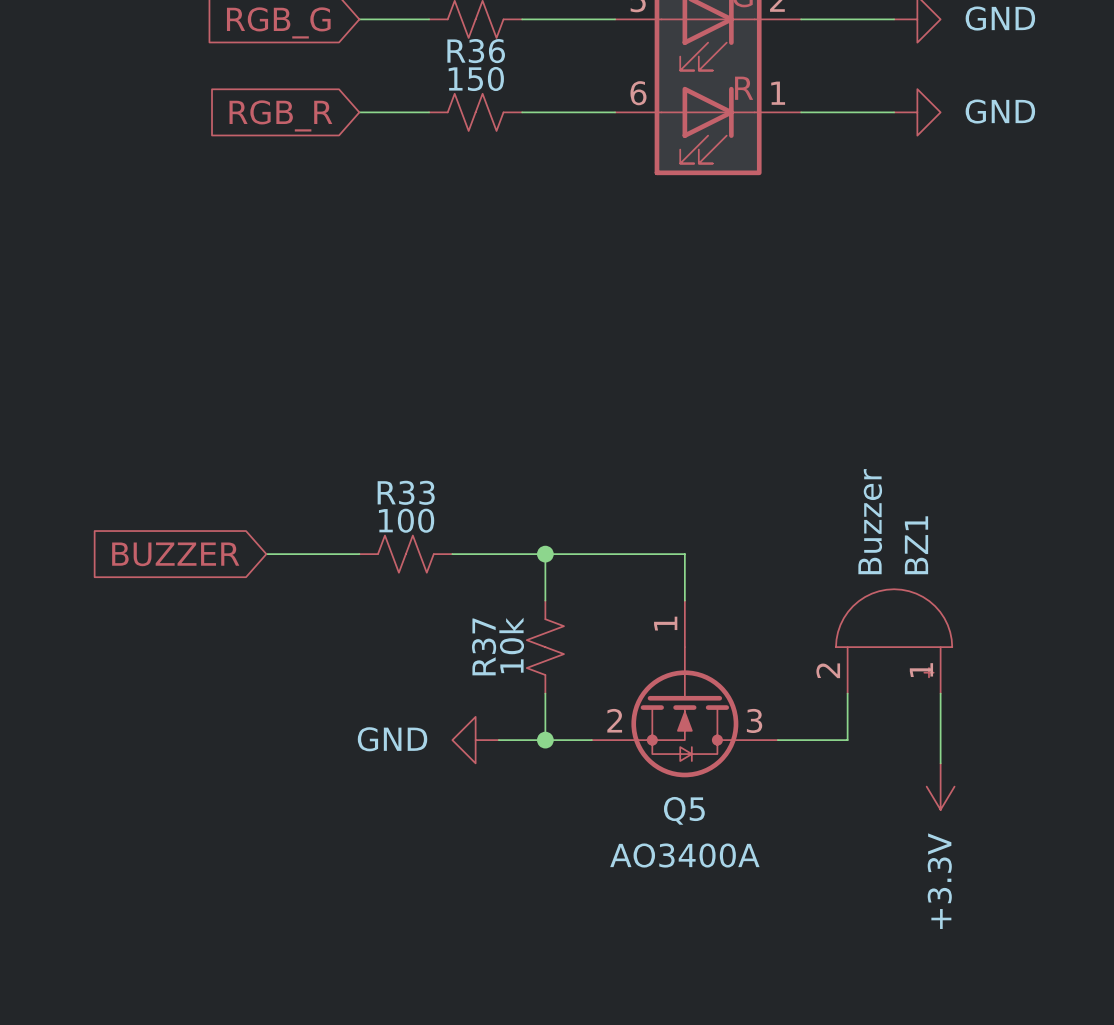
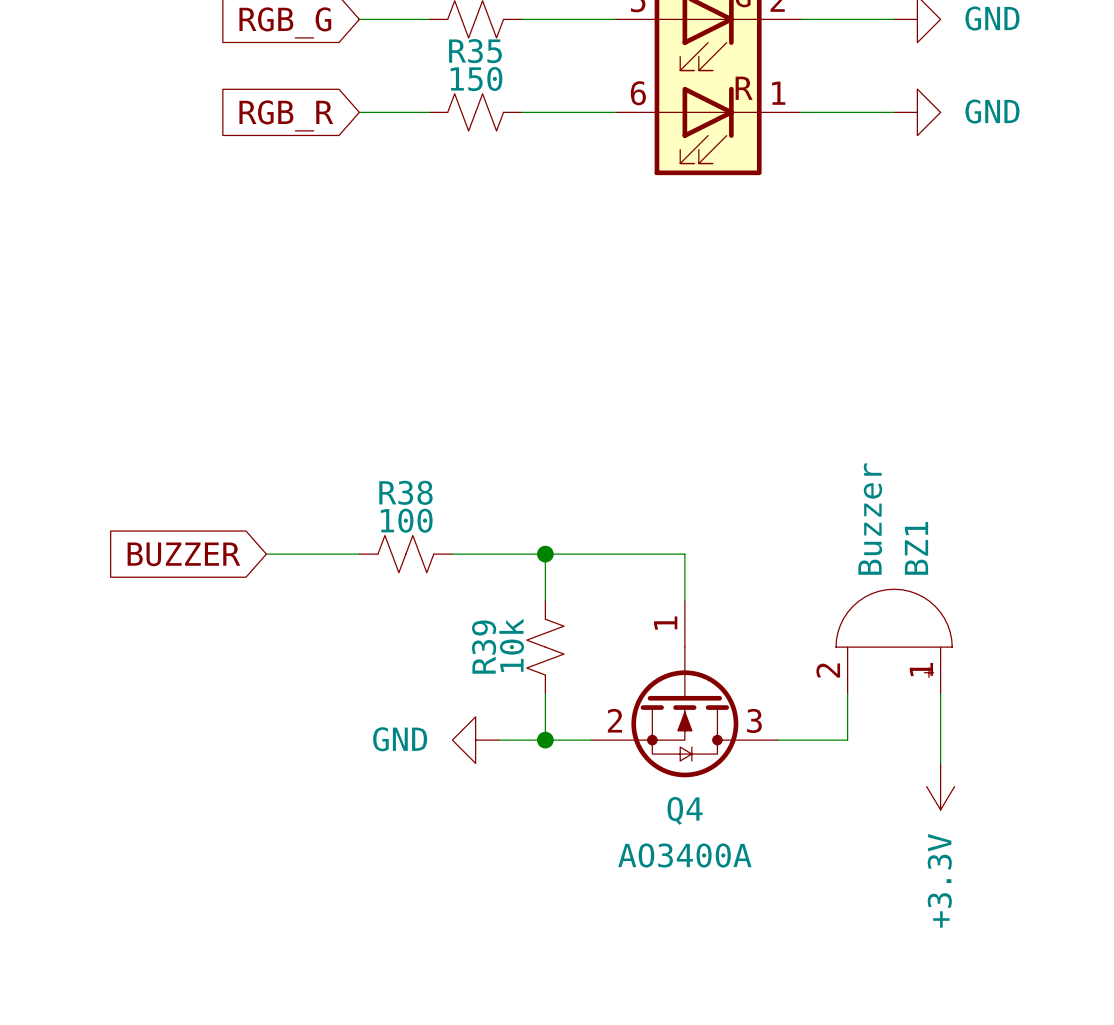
R36 name: R36 (476, 51) -> R35 (475, 51)
R33 name: R33 (406, 492) -> R38 (405, 492)
R37 name: R37 (484, 646) -> R39 (484, 647)
Q5 name: Q5 (684, 810) -> Q4 (685, 810)

